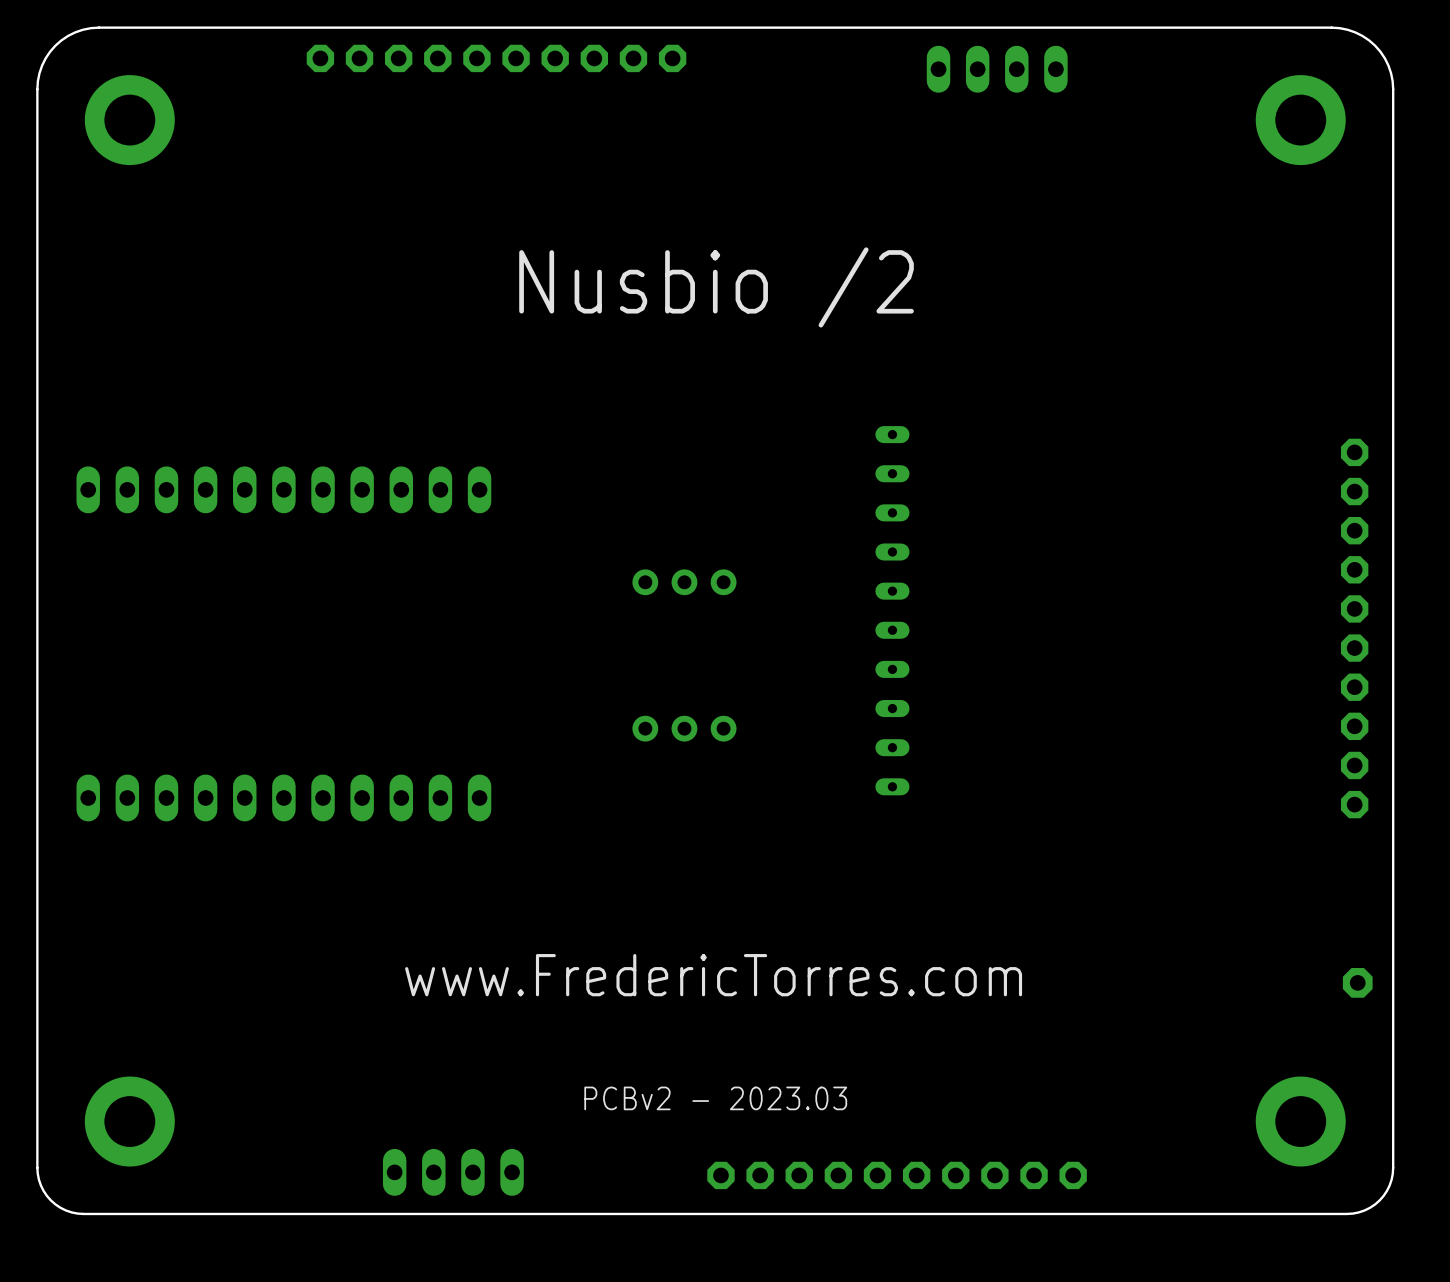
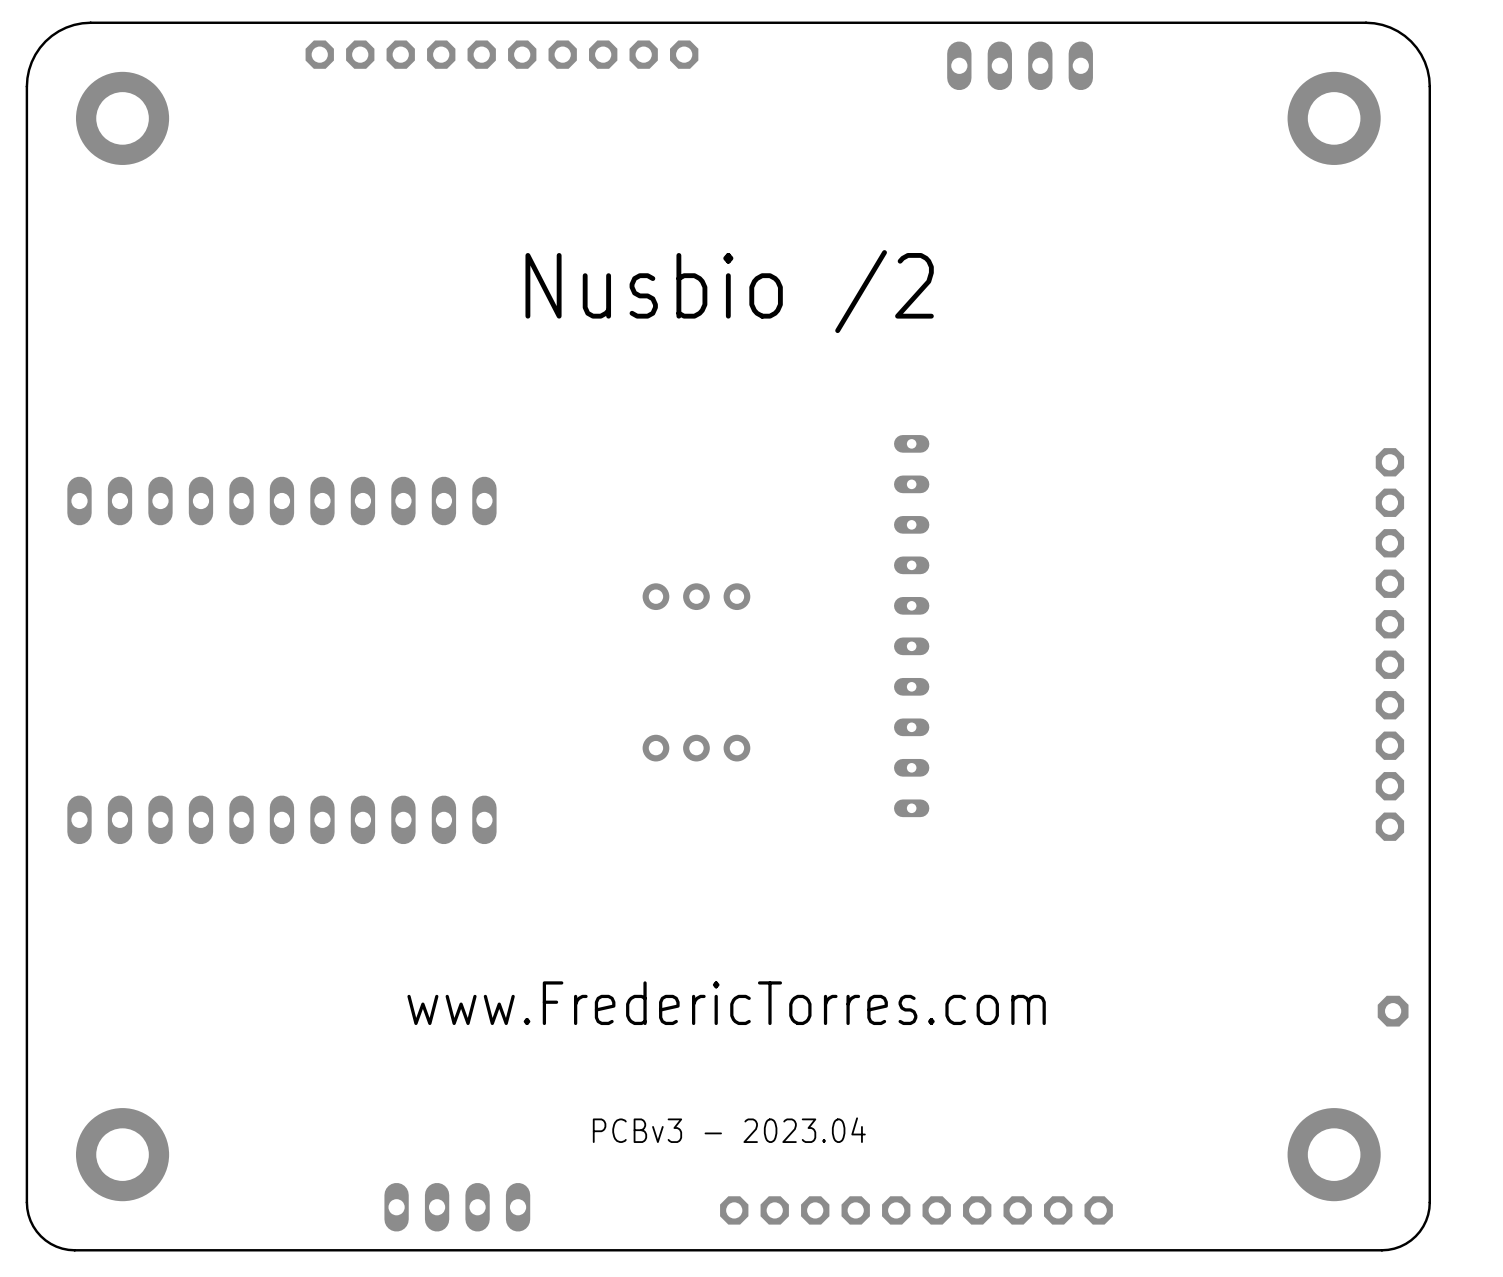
text: PCBv2 - 2023.03 (715, 1098) -> PCBv3 - 2023.04 (729, 1130)

